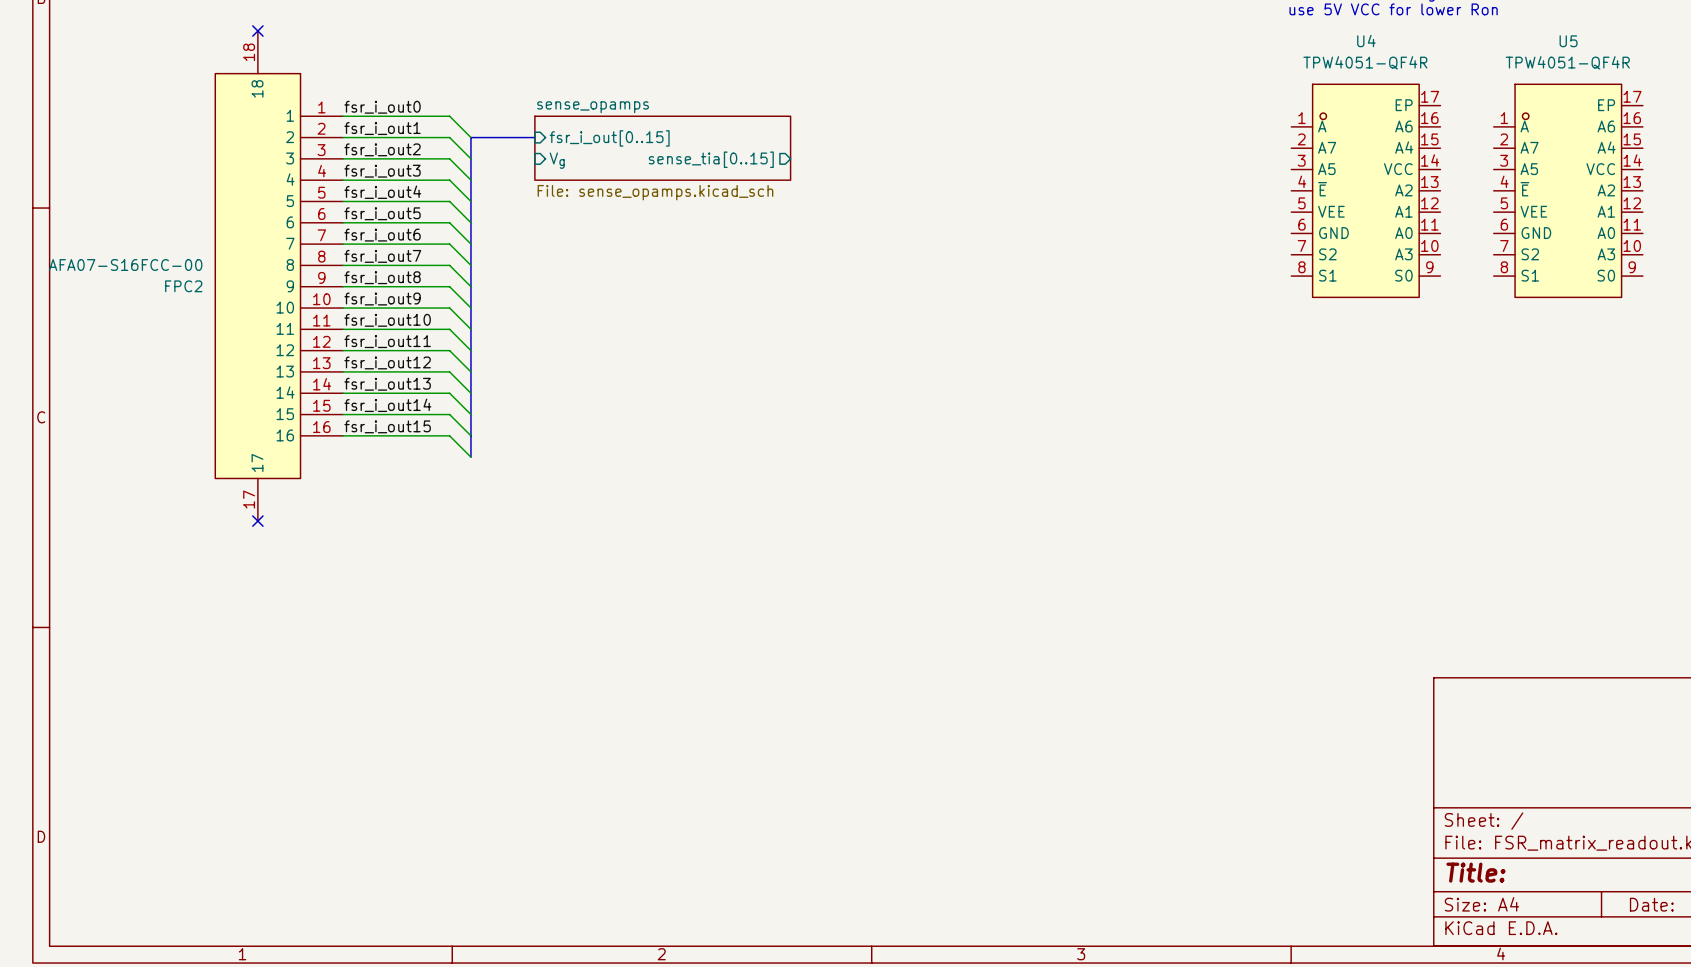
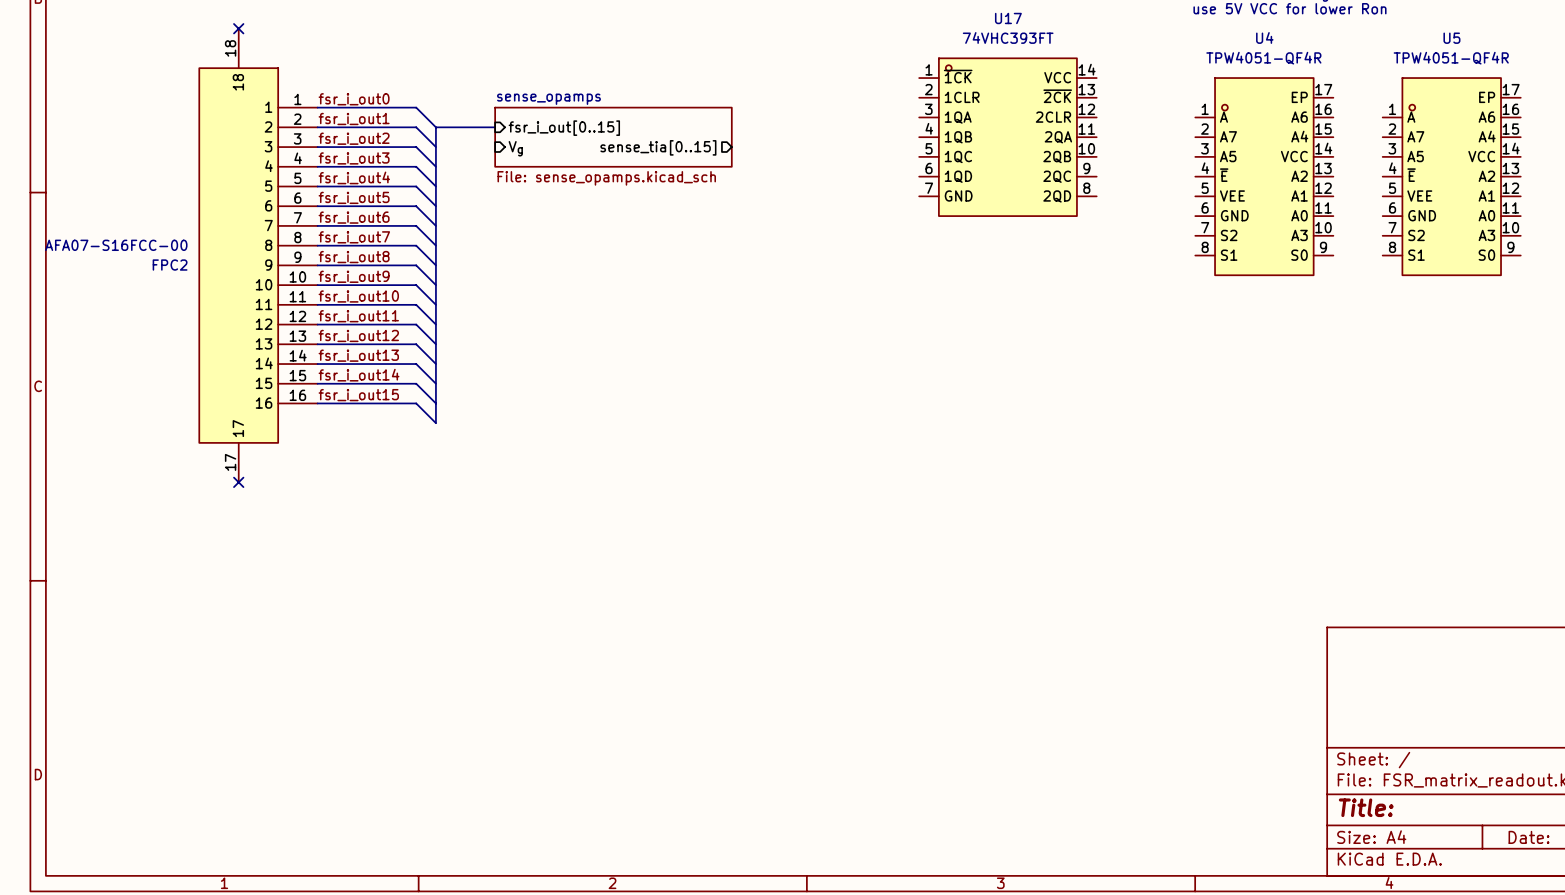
U17: none -> 74VHC393FT (1007, 137)

